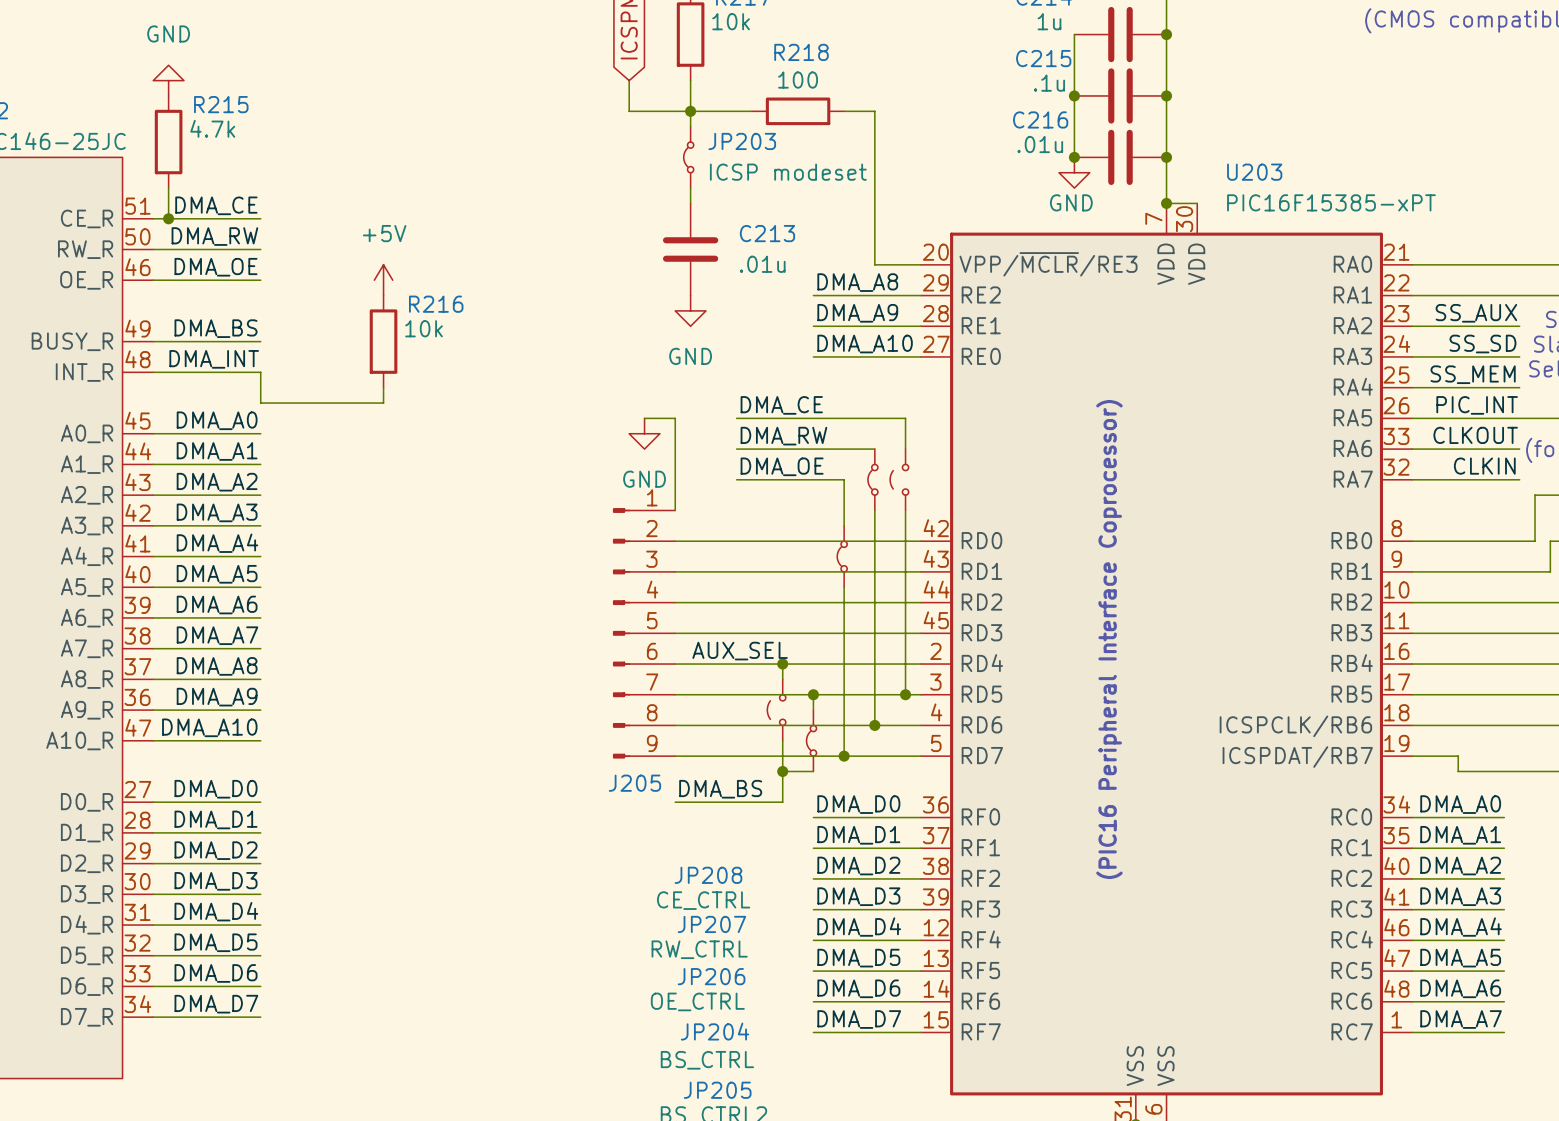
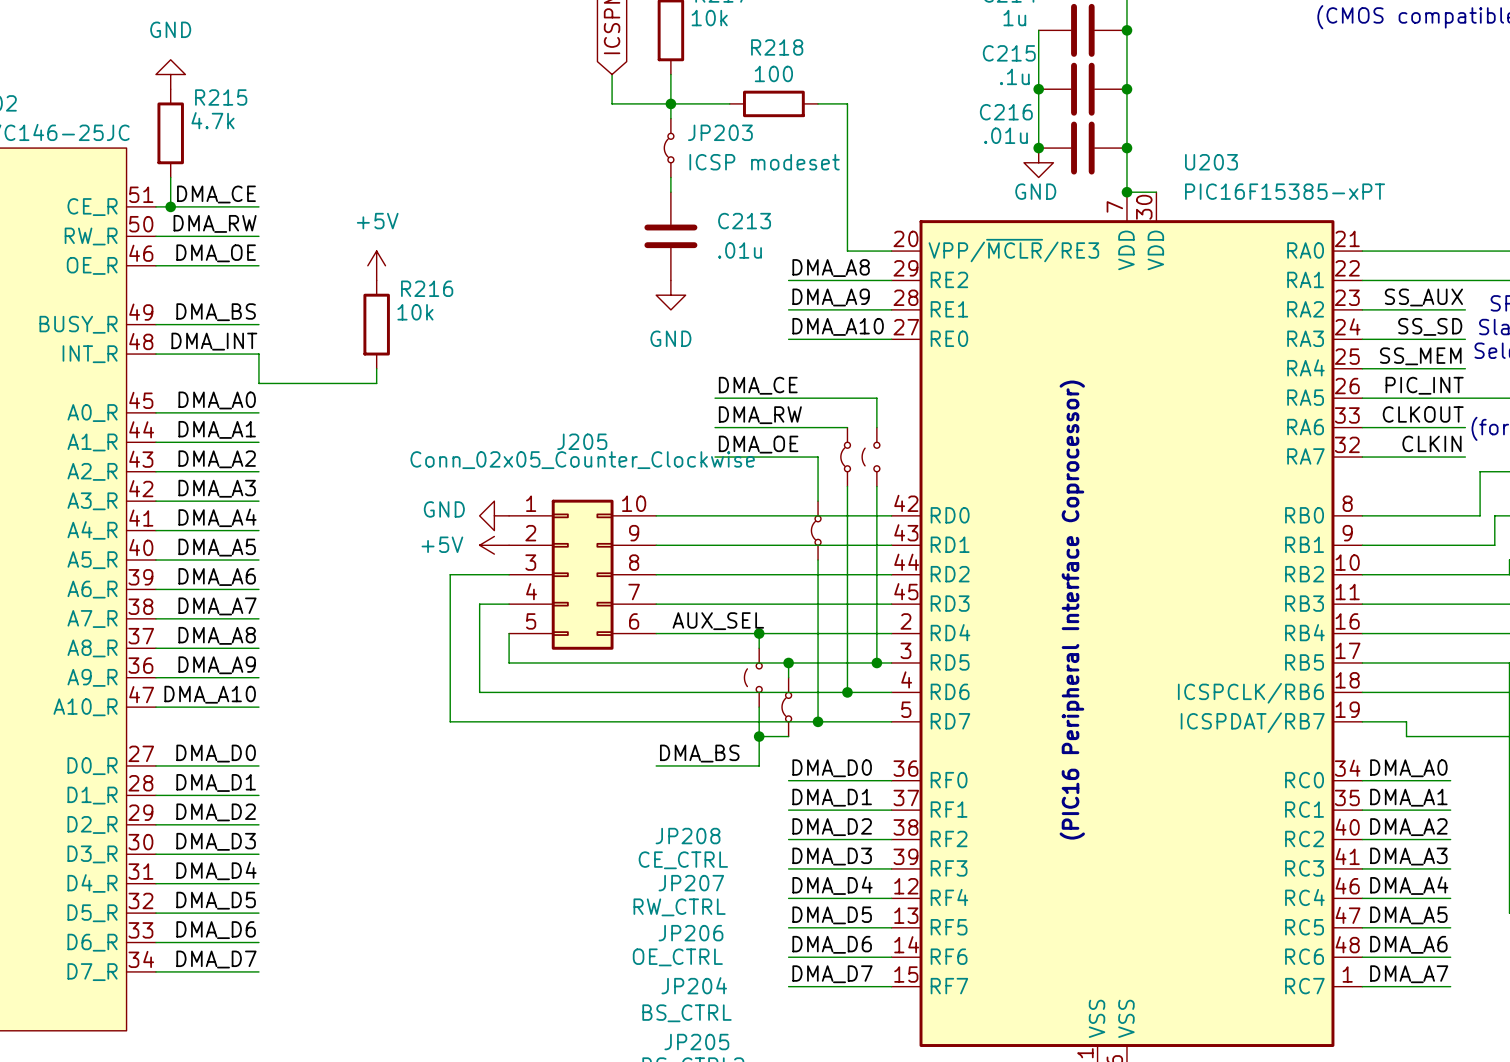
wire: (644, 418) (675, 418) (675, 510) -> none
power symbol rotation: 0° (644, 433) -> 90° clockwise (494, 515)
power symbol position: GND (644, 433) -> GND (494, 515)
J205 value: none -> Conn_02x05_Counter_Clockwise (582, 460)
J205 symbol: [612, 508, 676, 759] -> [509, 499, 657, 650]
power symbol: none -> +5V (494, 545)
wire: none -> (509, 574) (450, 574) (450, 721) (656, 721)
wire: none -> (509, 604) (479, 604) (479, 692) (656, 692)
wire: none -> (509, 633) (509, 662) (656, 662)
J205 name position: J205 (634, 783) -> J205 (582, 441)

